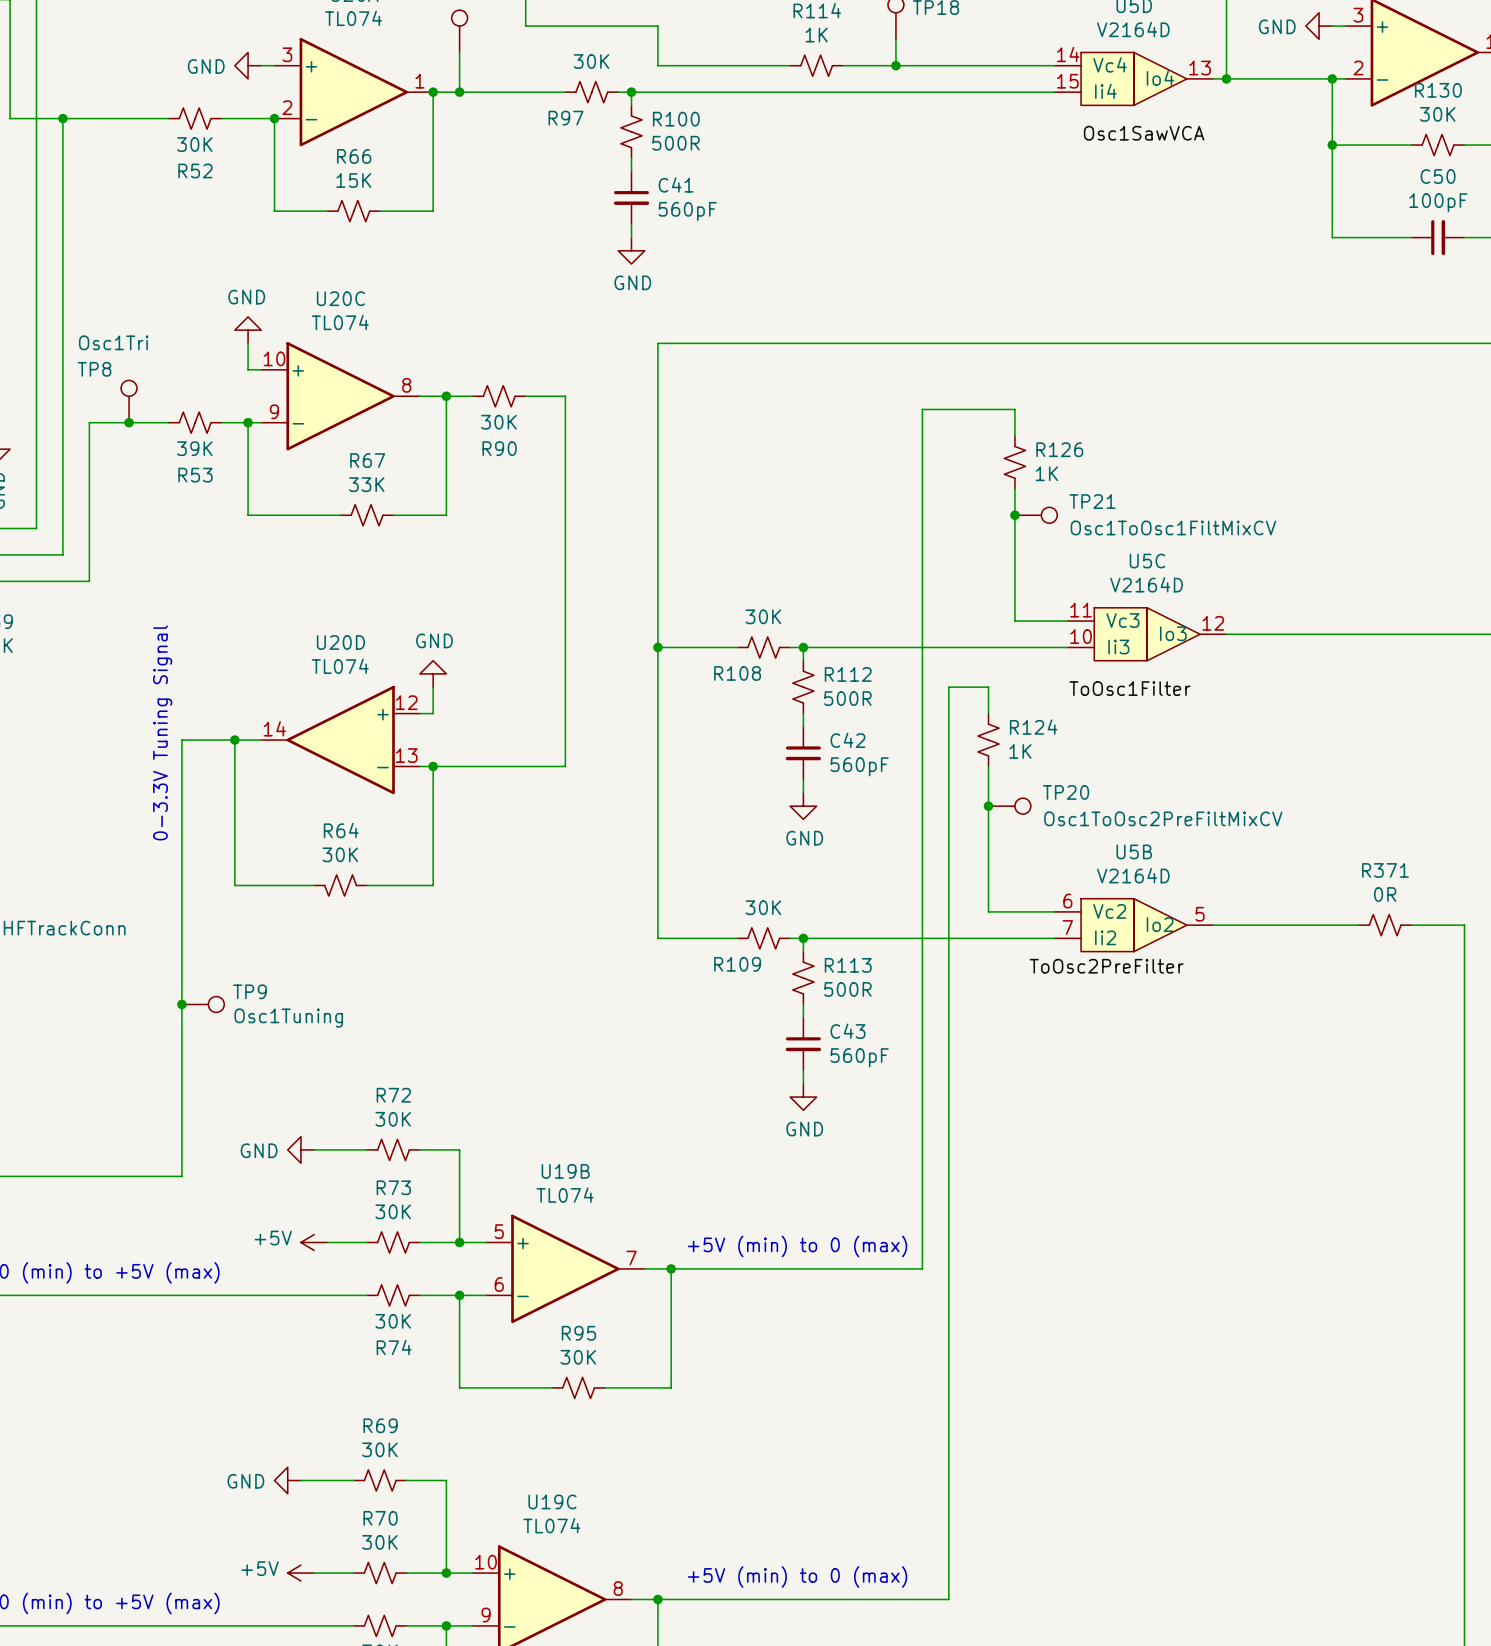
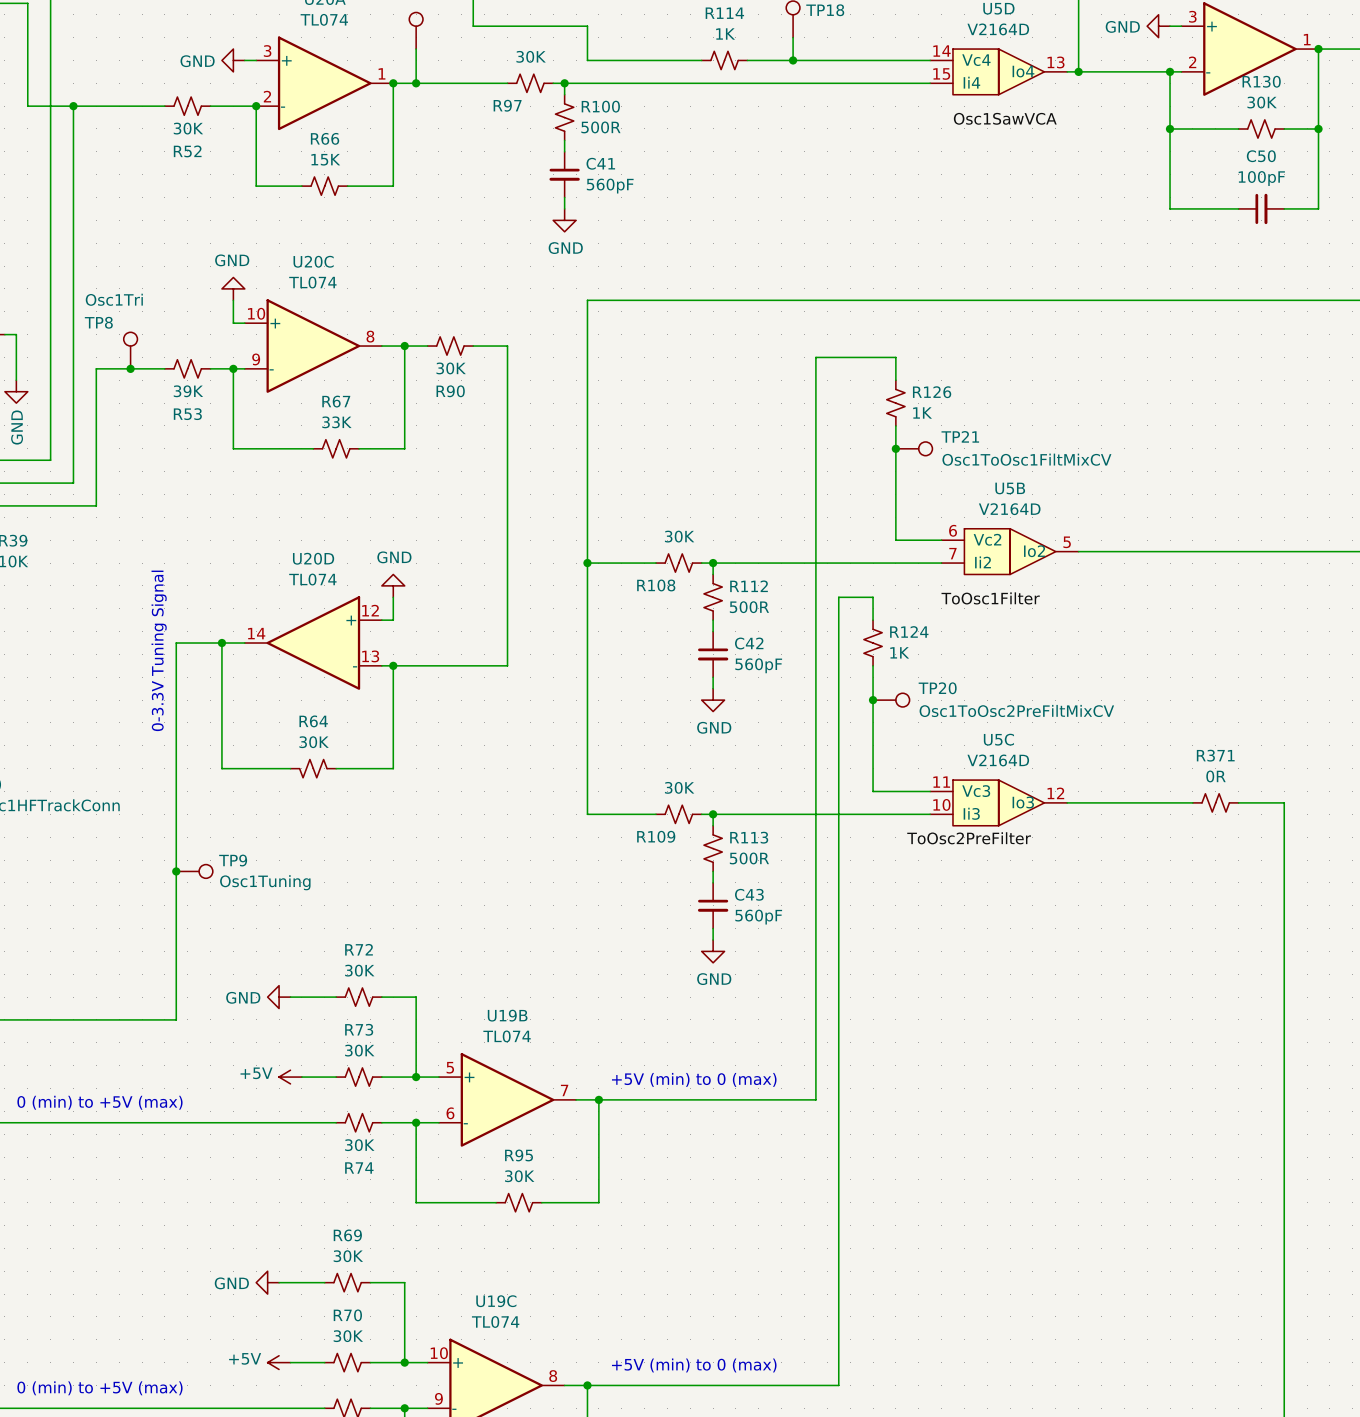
U5C position: (1147, 634) -> (998, 802)
U5B position: (1133, 925) -> (1010, 551)

